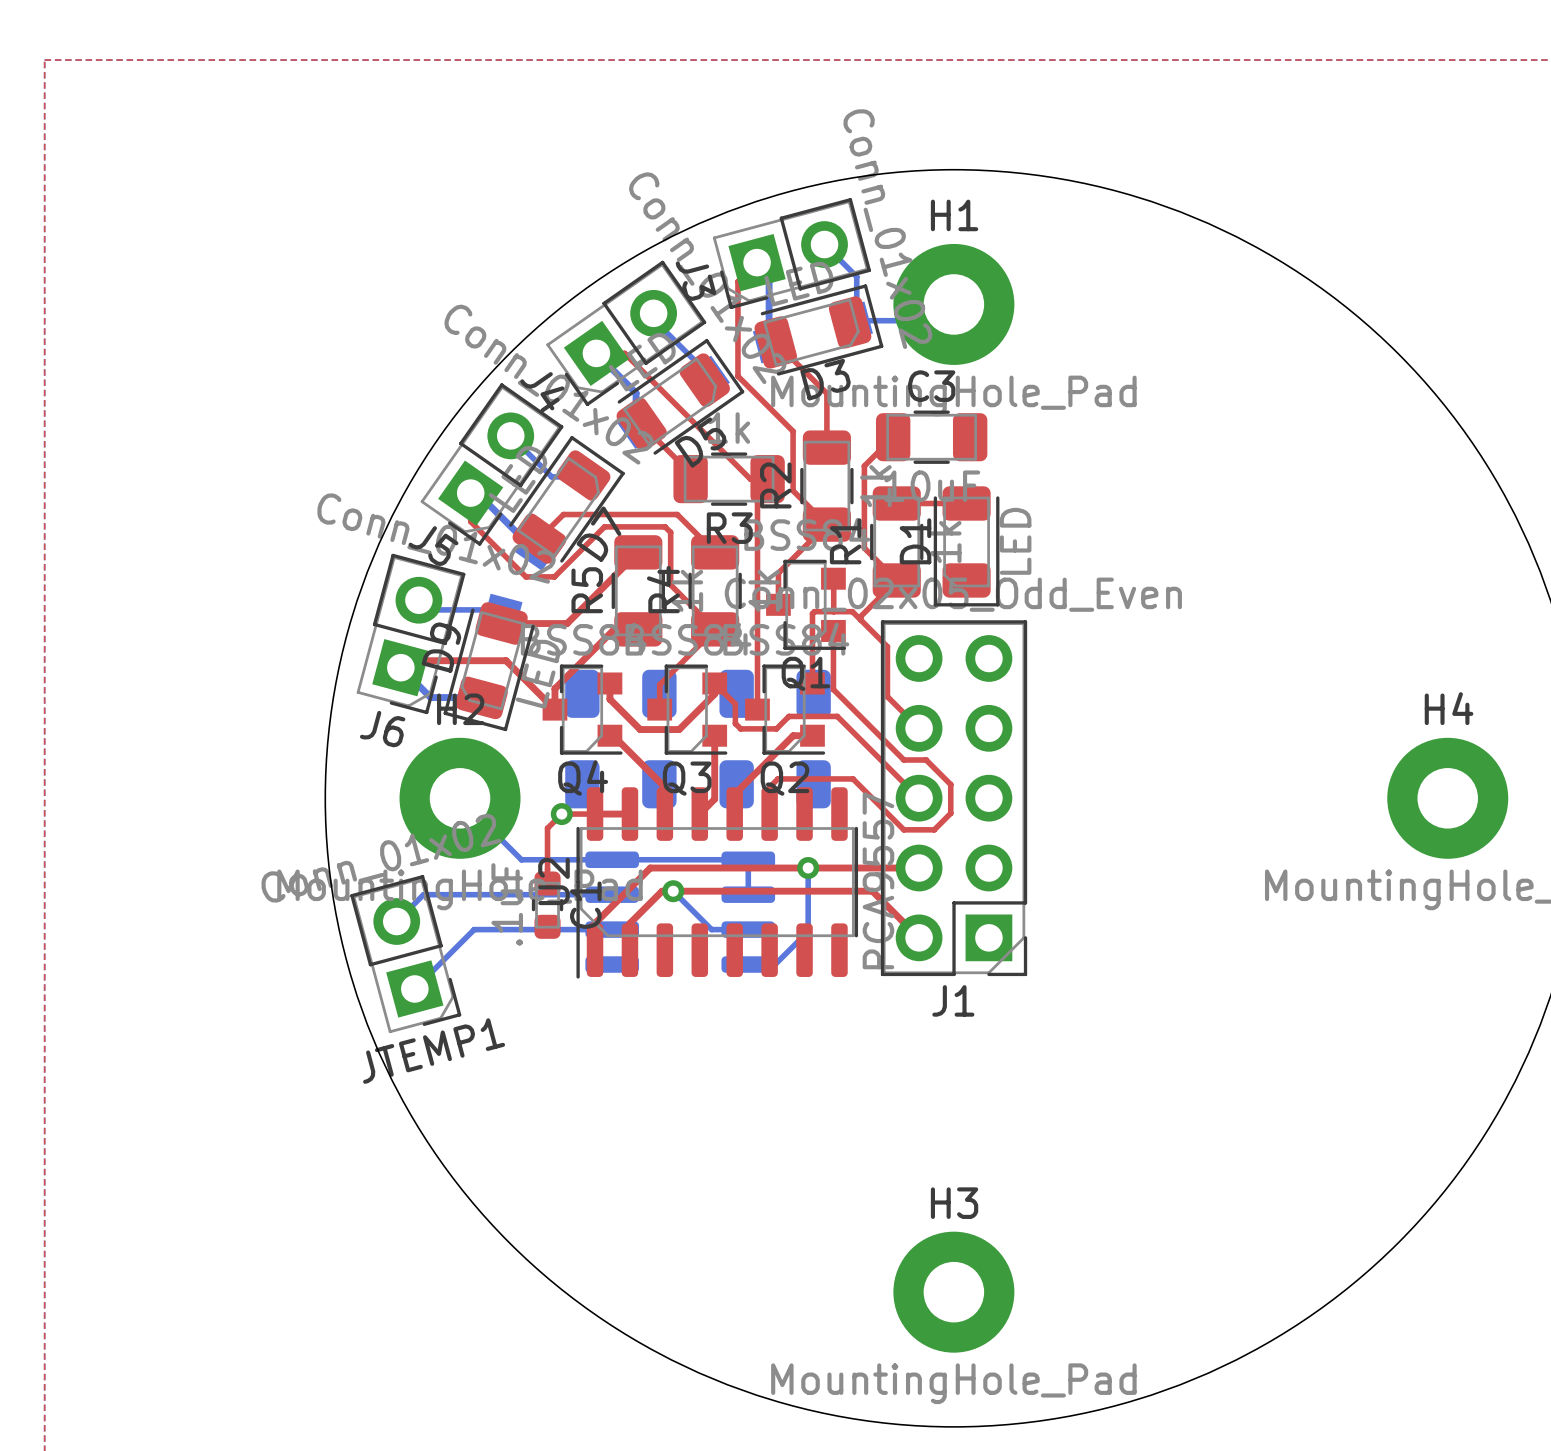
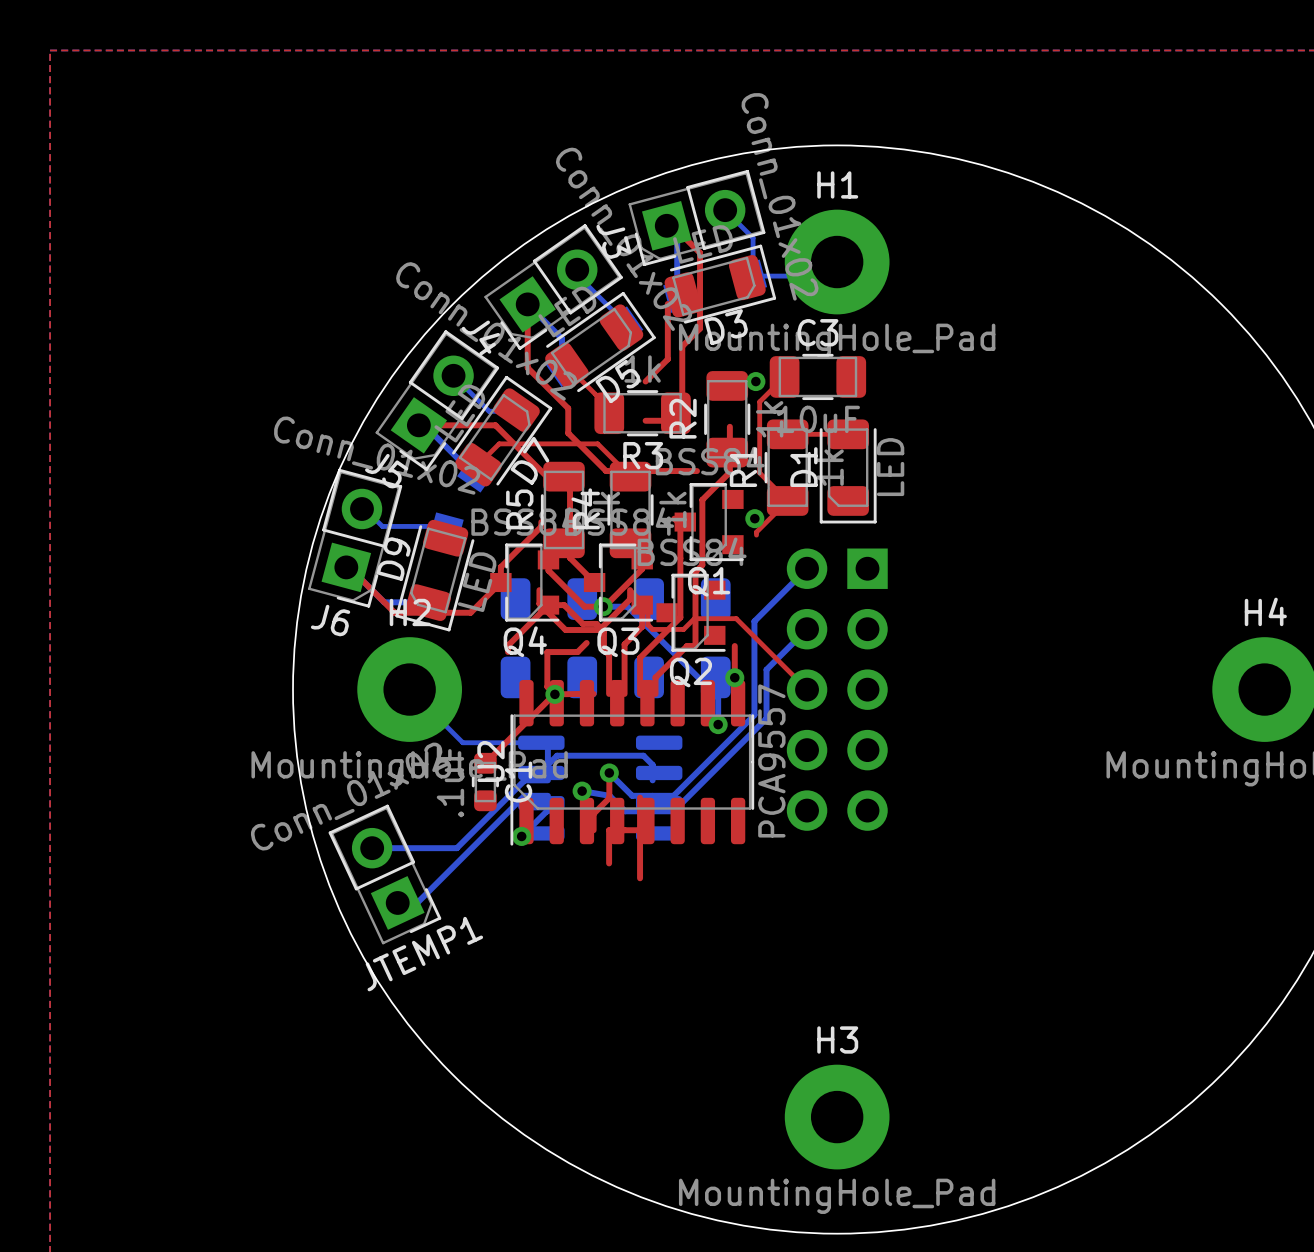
top track: none -> (660, 213) (700, 253) (700, 328) (682, 346) (682, 404) (665, 420) (645, 420)
top track: (757, 262) (737, 281) (737, 376) (793, 431) (793, 490) (826, 524) (778, 573) (778, 604) -> none
top track: (775, 342) (826, 393) (826, 447) -> none
top track: none -> (667, 303) (667, 359) (645, 381)
top track: (596, 353) (624, 353) (750, 479) (767, 479) (757, 489) (757, 709) -> (527, 304) (527, 367) (568, 408) (568, 433) (606, 471) (697, 471)
via: none -> (755, 381)
top track: (470, 493) (470, 521) (525, 576) (554, 576) (604, 526) (665, 526) (670, 532) (670, 584) (715, 629) (659, 684) (659, 709) -> (418, 425) (495, 425) (555, 485) (565, 485) (570, 490) (570, 557) (594, 582)
top track: none -> (729, 426) (729, 472) (702, 499) (702, 565) (695, 571) (695, 646) (687, 646) (655, 677) (655, 693)
top track: (638, 552) (567, 623) (501, 623) -> none
top track: (833, 579) (833, 611) -> none
top track: none -> (674, 518) (680, 524) (680, 617) (640, 657) (640, 693)
via: none -> (754, 518)
top track: (638, 629) (614, 629) (554, 688) (554, 709) (506, 660) (407, 660) (400, 667) -> (541, 522) (541, 526) (500, 567) (500, 582) (470, 612) (394, 612) (358, 576)
top track: (833, 630) (833, 689) (903, 759) (926, 759) (950, 784) (950, 813) (934, 829) (903, 829) (853, 778) (777, 778) (769, 787) (769, 814) -> none
J6 position: (411, 633) -> (355, 538)
top track: none -> (548, 559) (548, 570) (584, 606) (604, 606) (642, 569) (642, 559)
bottom track: none -> (807, 568) (754, 621) (754, 715) (673, 795) (632, 795) (609, 772)
top track: (812, 683) (812, 613) (814, 611) (852, 611) (887, 646) (887, 696) (919, 728) -> none
top track: none -> (642, 605) (642, 626) (624, 644) (624, 693)
bottom track: none -> (603, 606) (627, 606) (718, 697) (718, 724)
via: none -> (603, 606)
Q4 position: (582, 709) -> (524, 582)
Q3 position: (687, 709) -> (618, 582)
bottom track: none -> (807, 629) (766, 669) (766, 718) (673, 811) (625, 811) (609, 795) (582, 791)
top track: (609, 735) (613, 735) (664, 787) (664, 814) -> none
top track: (714, 735) (714, 799) (699, 814) -> none
top track: (812, 735) (793, 735) (734, 794) (734, 814) -> none
top track: none -> (586, 642) (577, 652) (547, 652) (547, 686) (554, 694) (593, 693)
top track: none -> (734, 646) (734, 677)
top track: none -> (508, 652) (508, 645) (548, 605) (564, 605) (582, 623) (596, 623) (603, 631) (603, 649) (609, 655) (609, 693)
via: none -> (734, 677)
J1 side: top (954, 798) -> bottom (837, 689)
via: none -> (554, 694)
via: (561, 814) -> none
top track: (629, 814) (561, 814) (547, 828) (547, 883) -> (554, 693) (485, 763)
bottom track: (617, 859) (748, 859) (748, 894) -> (545, 742) (547, 744) (547, 764) (557, 755) (643, 755) (652, 764) (652, 780)
bottom track: (808, 868) (808, 931) (775, 964) (748, 964) -> none
via position: (808, 868) -> (718, 724)
top track: (919, 868) (650, 868) (595, 923) (595, 950) -> none
bottom track: (673, 891) (711, 929) (748, 929) -> none
via position: (673, 891) -> (609, 772)
bottom track: (612, 894) (423, 894) (396, 921) -> none
top track: none -> (609, 772) (609, 798) (593, 813) (593, 830)
bottom track: none -> (547, 780) (524, 780) (456, 848) (372, 848)
via: none -> (582, 791)
bottom track: none -> (547, 795) (524, 795) (417, 902) (397, 902)
top track: none -> (640, 797) (640, 878)
bottom track: (612, 929) (474, 929) (414, 988) -> none
top track: (919, 937) (872, 891) (662, 891) (629, 923) (629, 950) -> none
bottom track: none -> (547, 811) (521, 836)
JTEMP1 rotation: 0° (405, 954) -> 10° counterclockwise (384, 874)
top track: none -> (640, 830) (609, 830) (609, 863)
via: none -> (521, 836)

